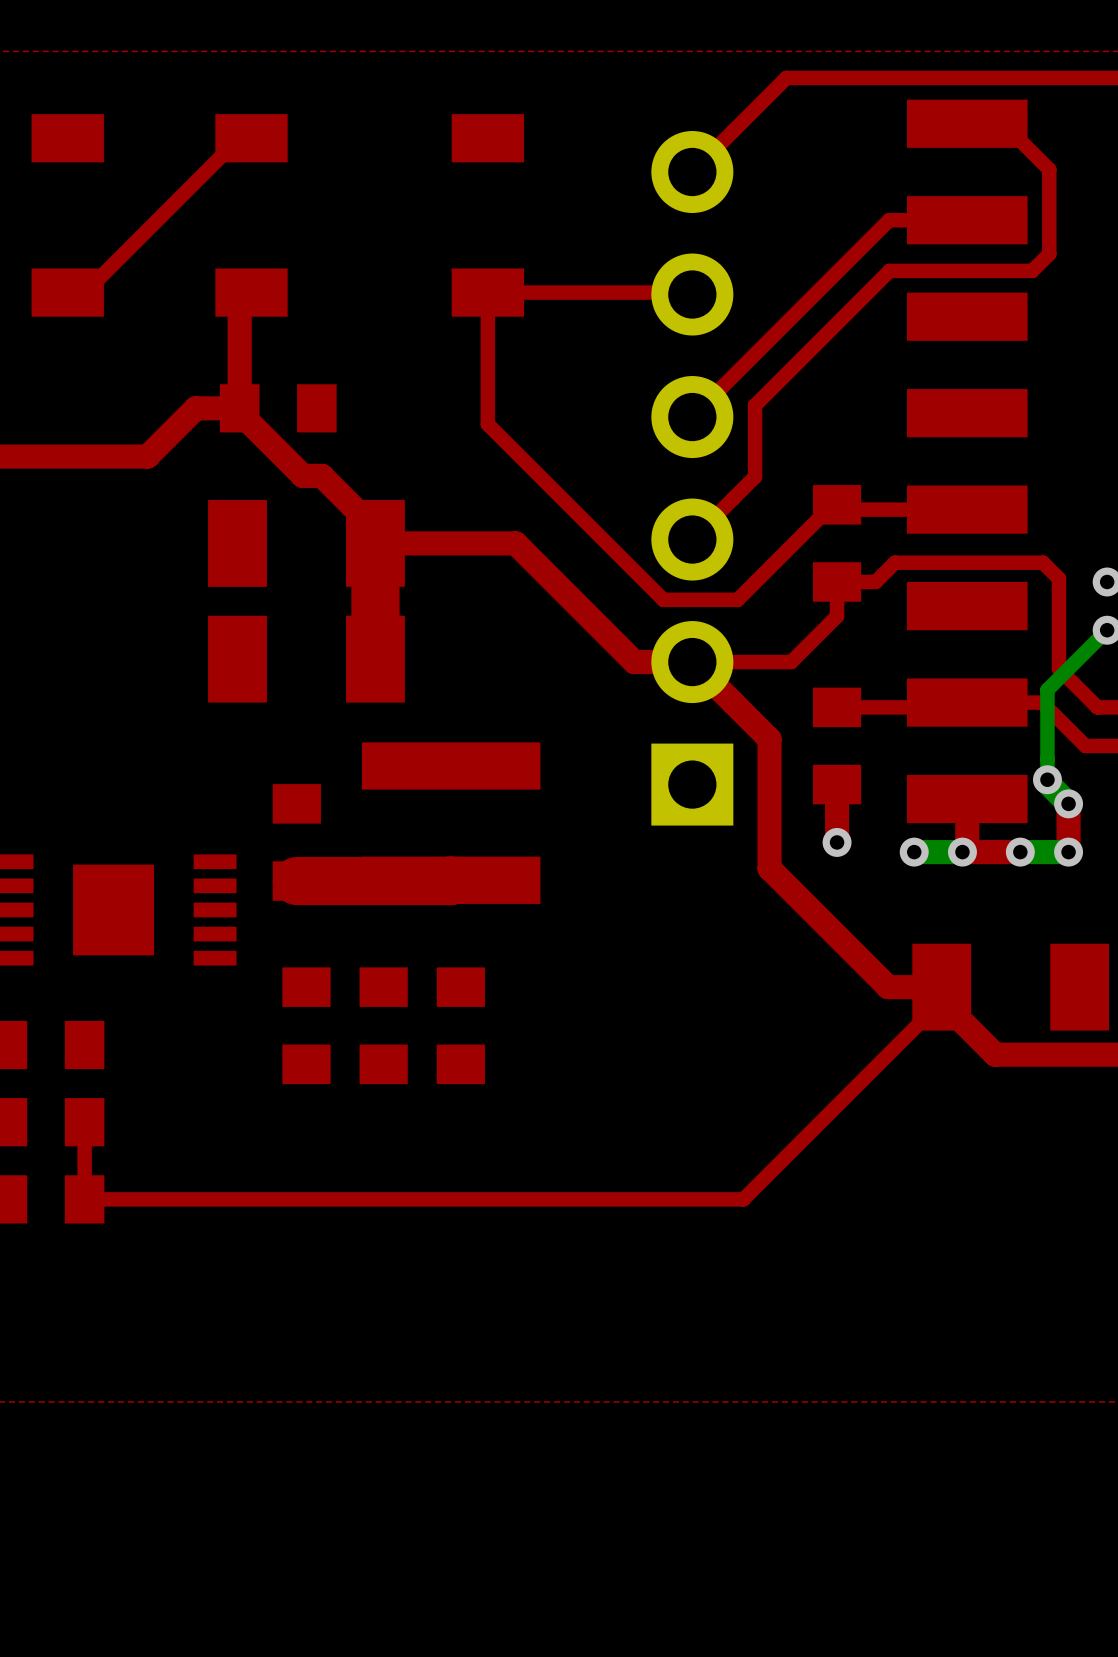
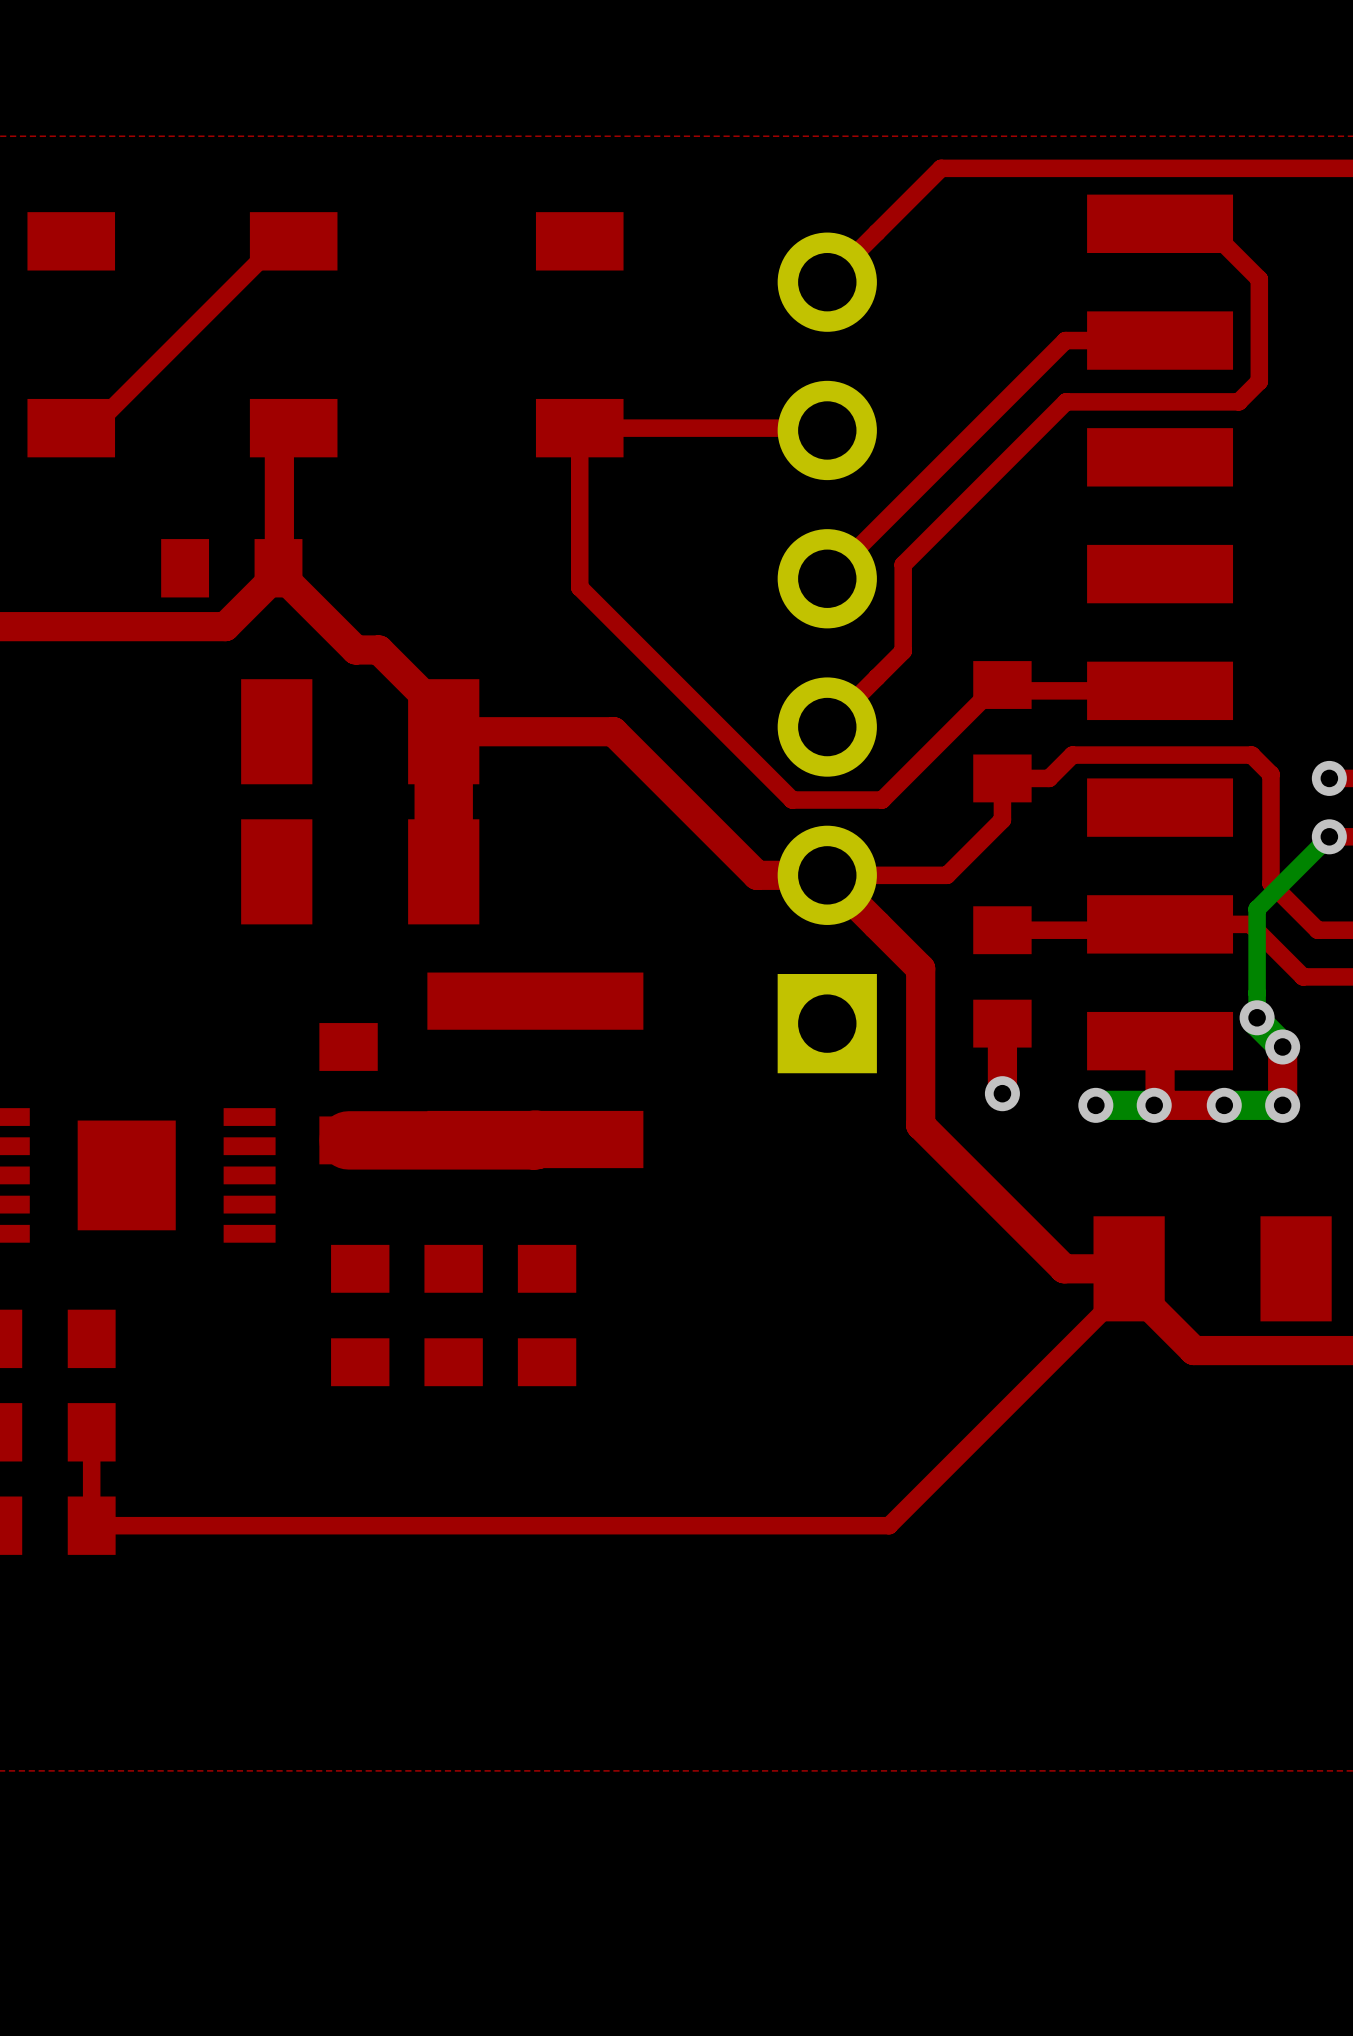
top track: (239, 408) (195, 408) (147, 456) -> (278, 568) (278, 573) (225, 626) (167, 626)
part position: (278, 408) -> (231, 568)

